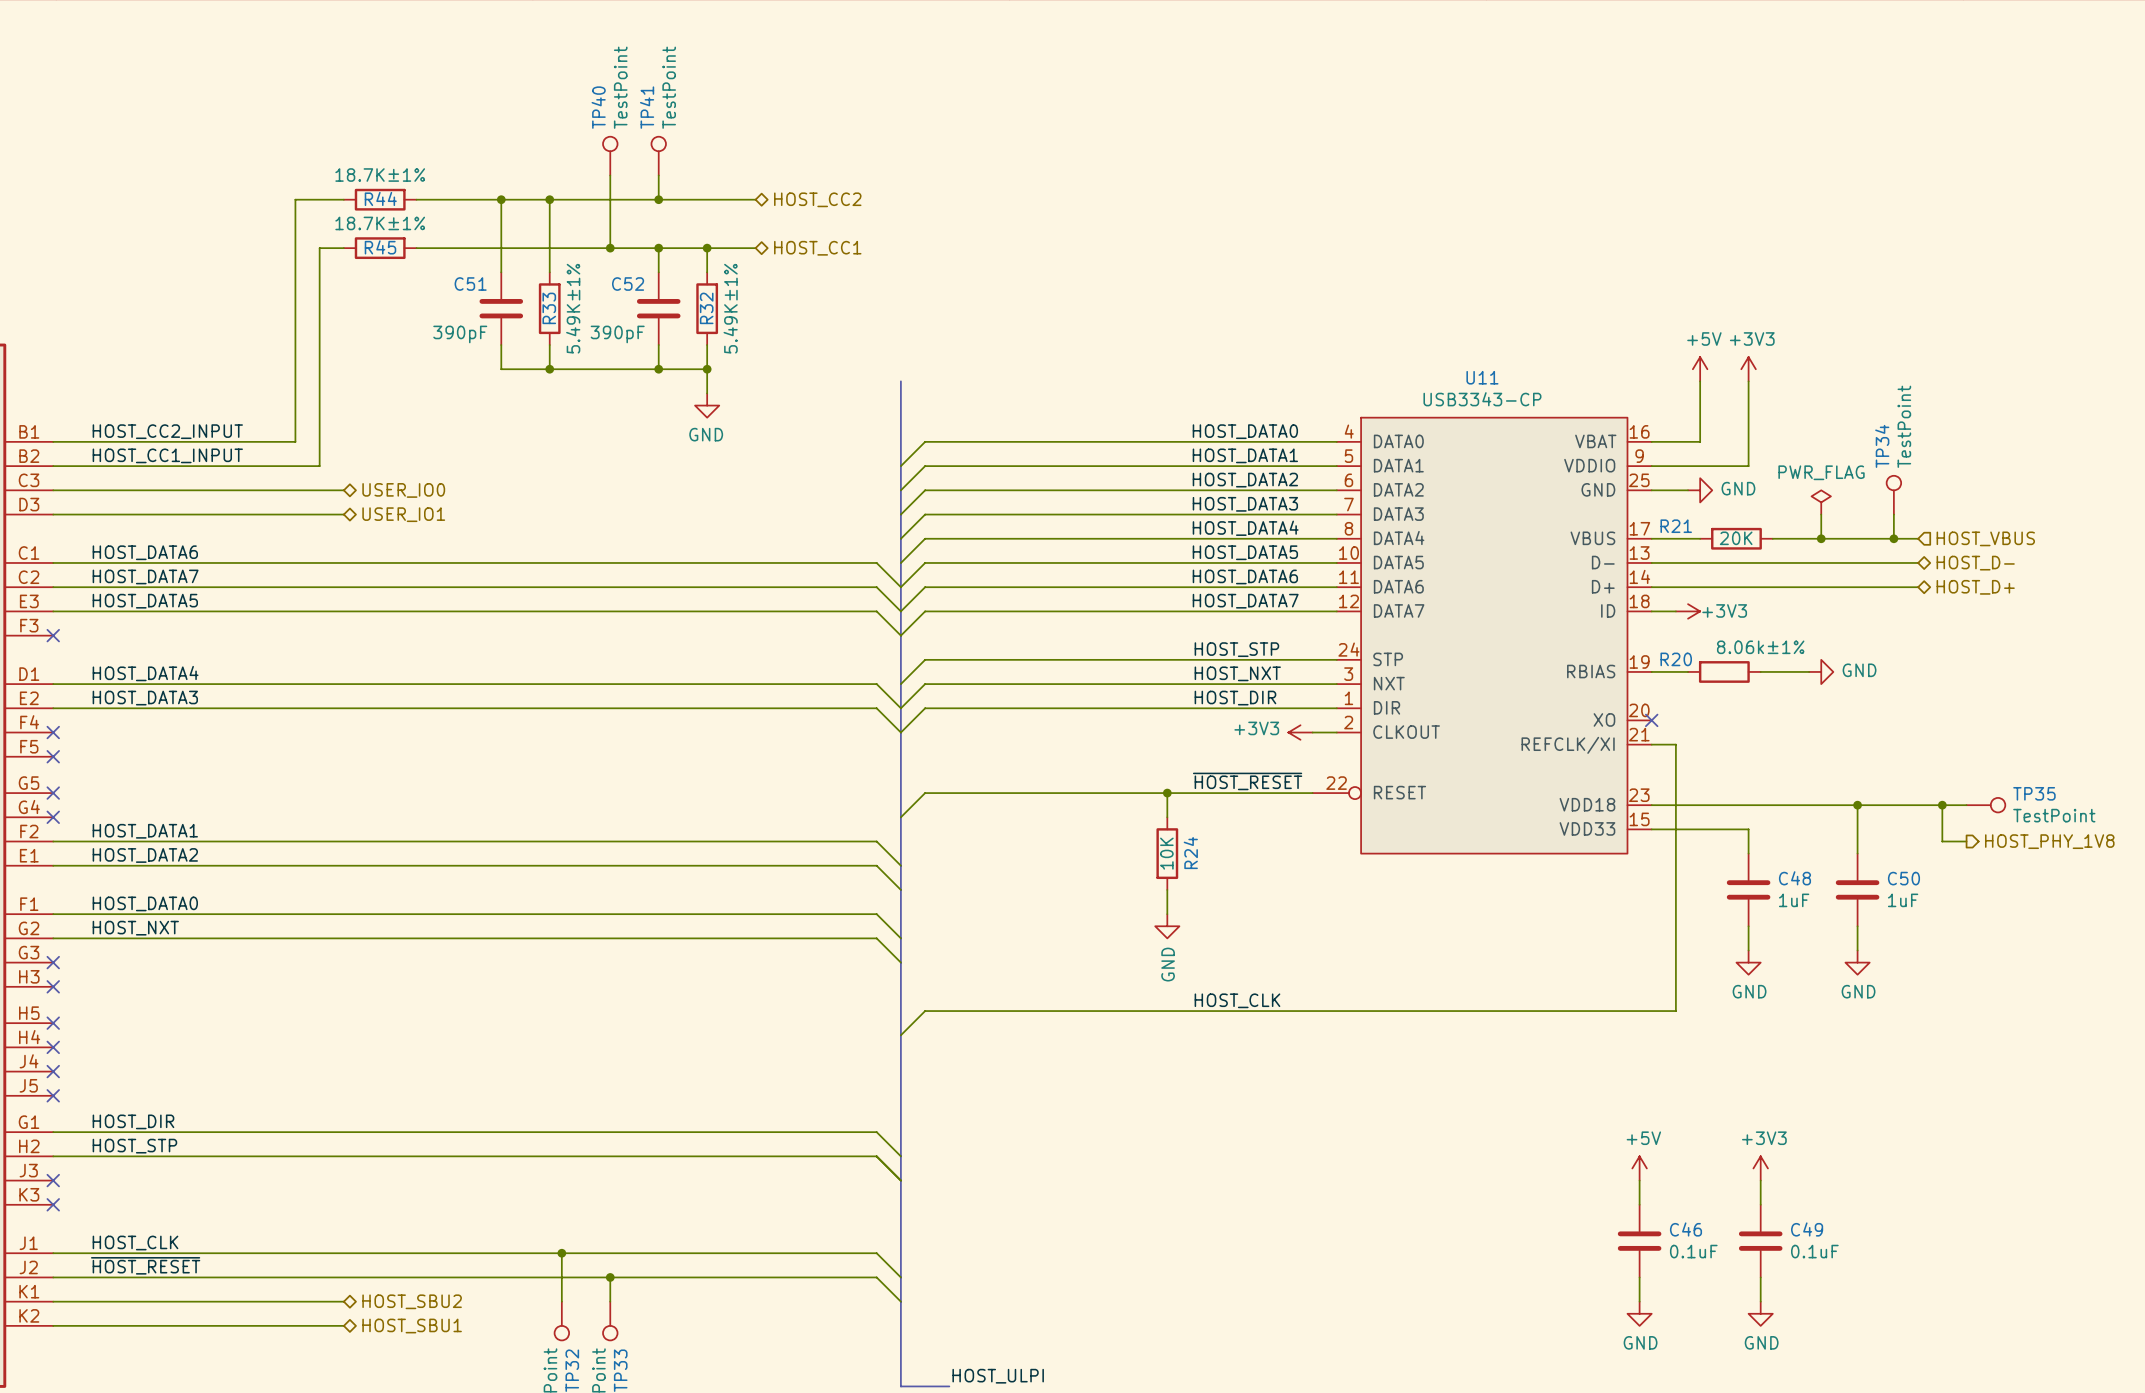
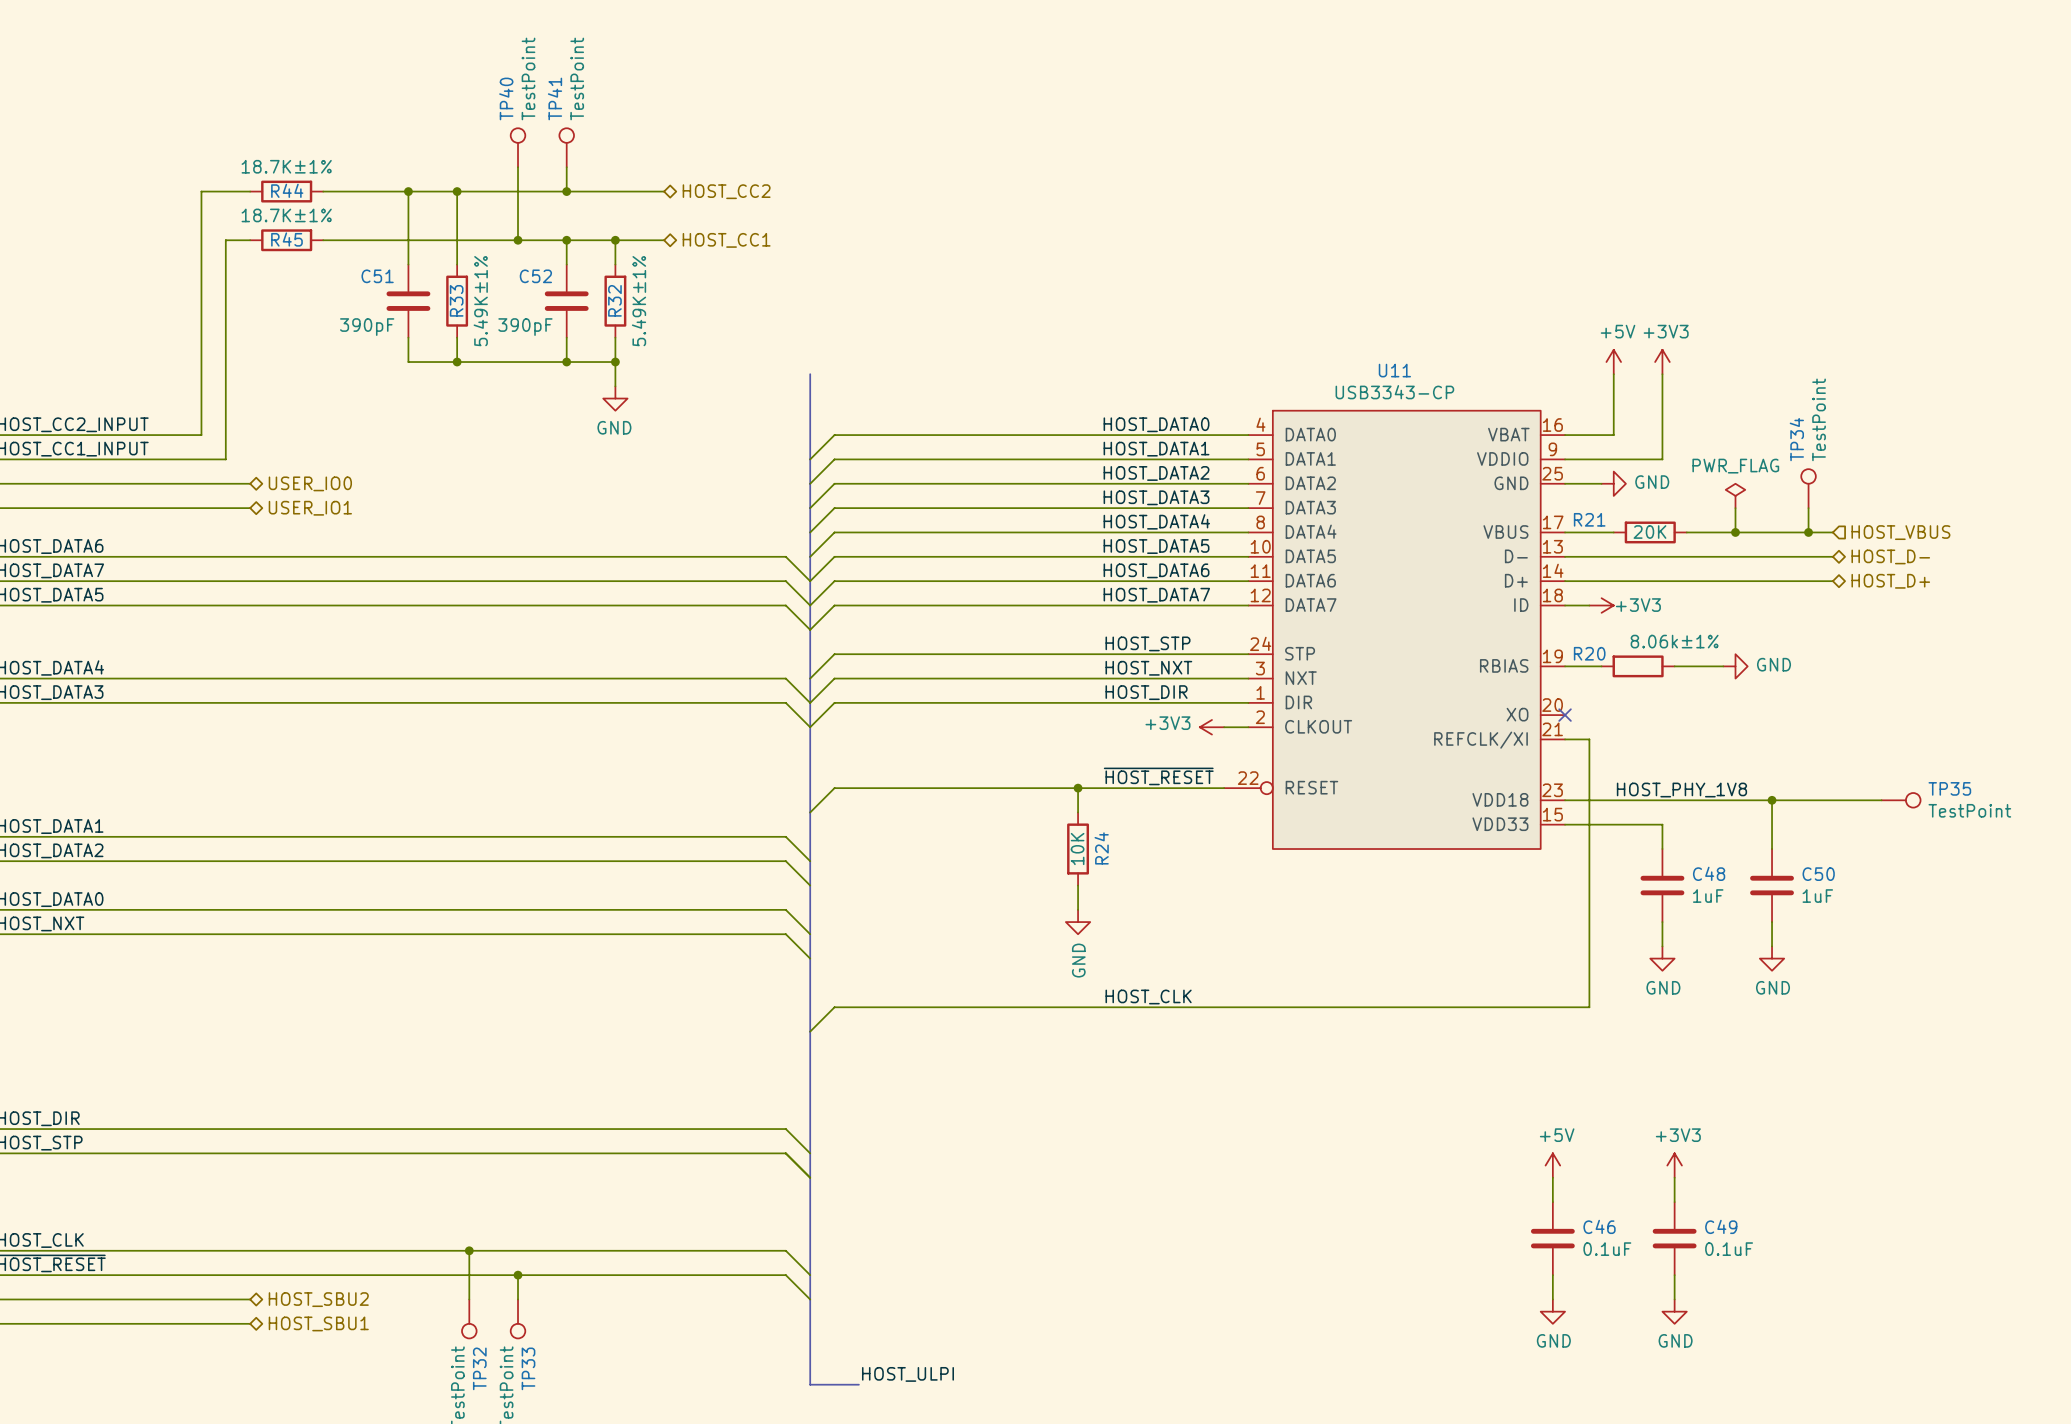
label: none -> HOST_PHY_1V8 (1681, 790)
wire: (1942, 805) (1942, 841) (1966, 841) -> none
junction: (1942, 805) -> none
hierarchical label: HOST_PHY_1V8 (2049, 841) -> none

